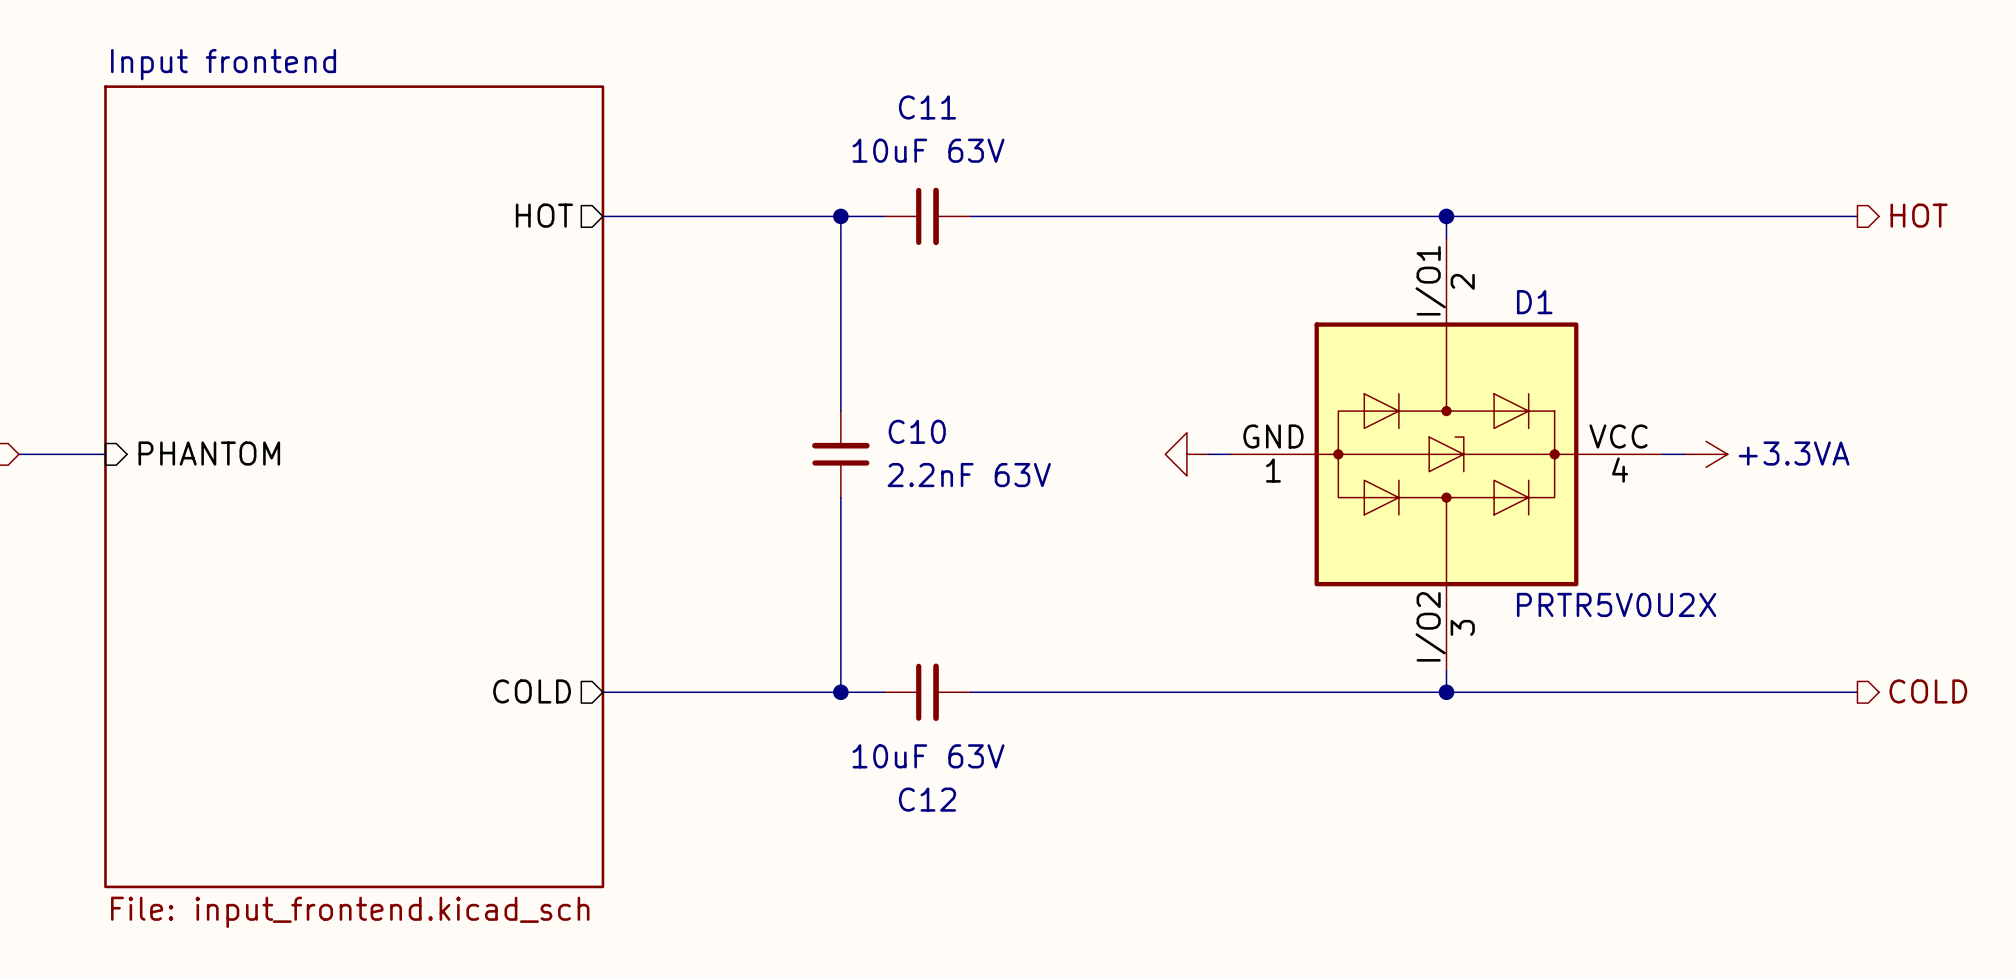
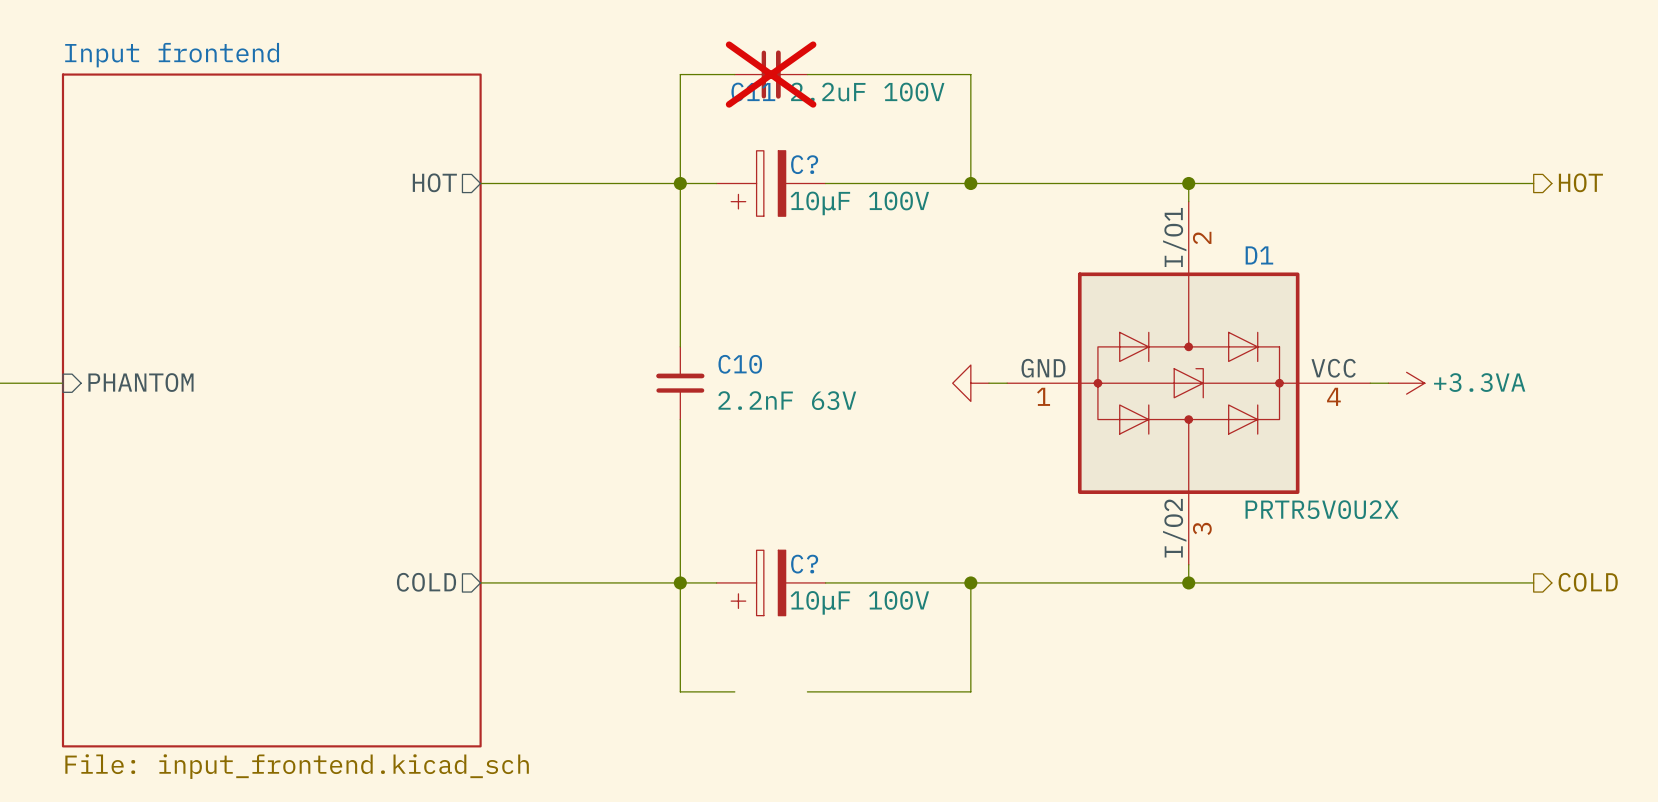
wire: none -> (734, 74) (680, 74) (680, 183)
C11 do-not-place cross: none -> (771, 74)
wire: none -> (807, 74) (970, 74) (970, 183)
C11 value: 10uF 63V (928, 150) -> 2.2uF 100V (867, 92)
C11 position: (927, 216) -> (771, 74)
C?: none -> 10μF 100V (771, 183)
junction: none -> (970, 183)
wire: none -> (680, 582) (680, 691) (734, 691)
C12: 10uF 63V (927, 692) -> none
C?: none -> 10μF 100V (771, 582)
wire: none -> (970, 582) (970, 691) (807, 691)
junction: none -> (970, 582)

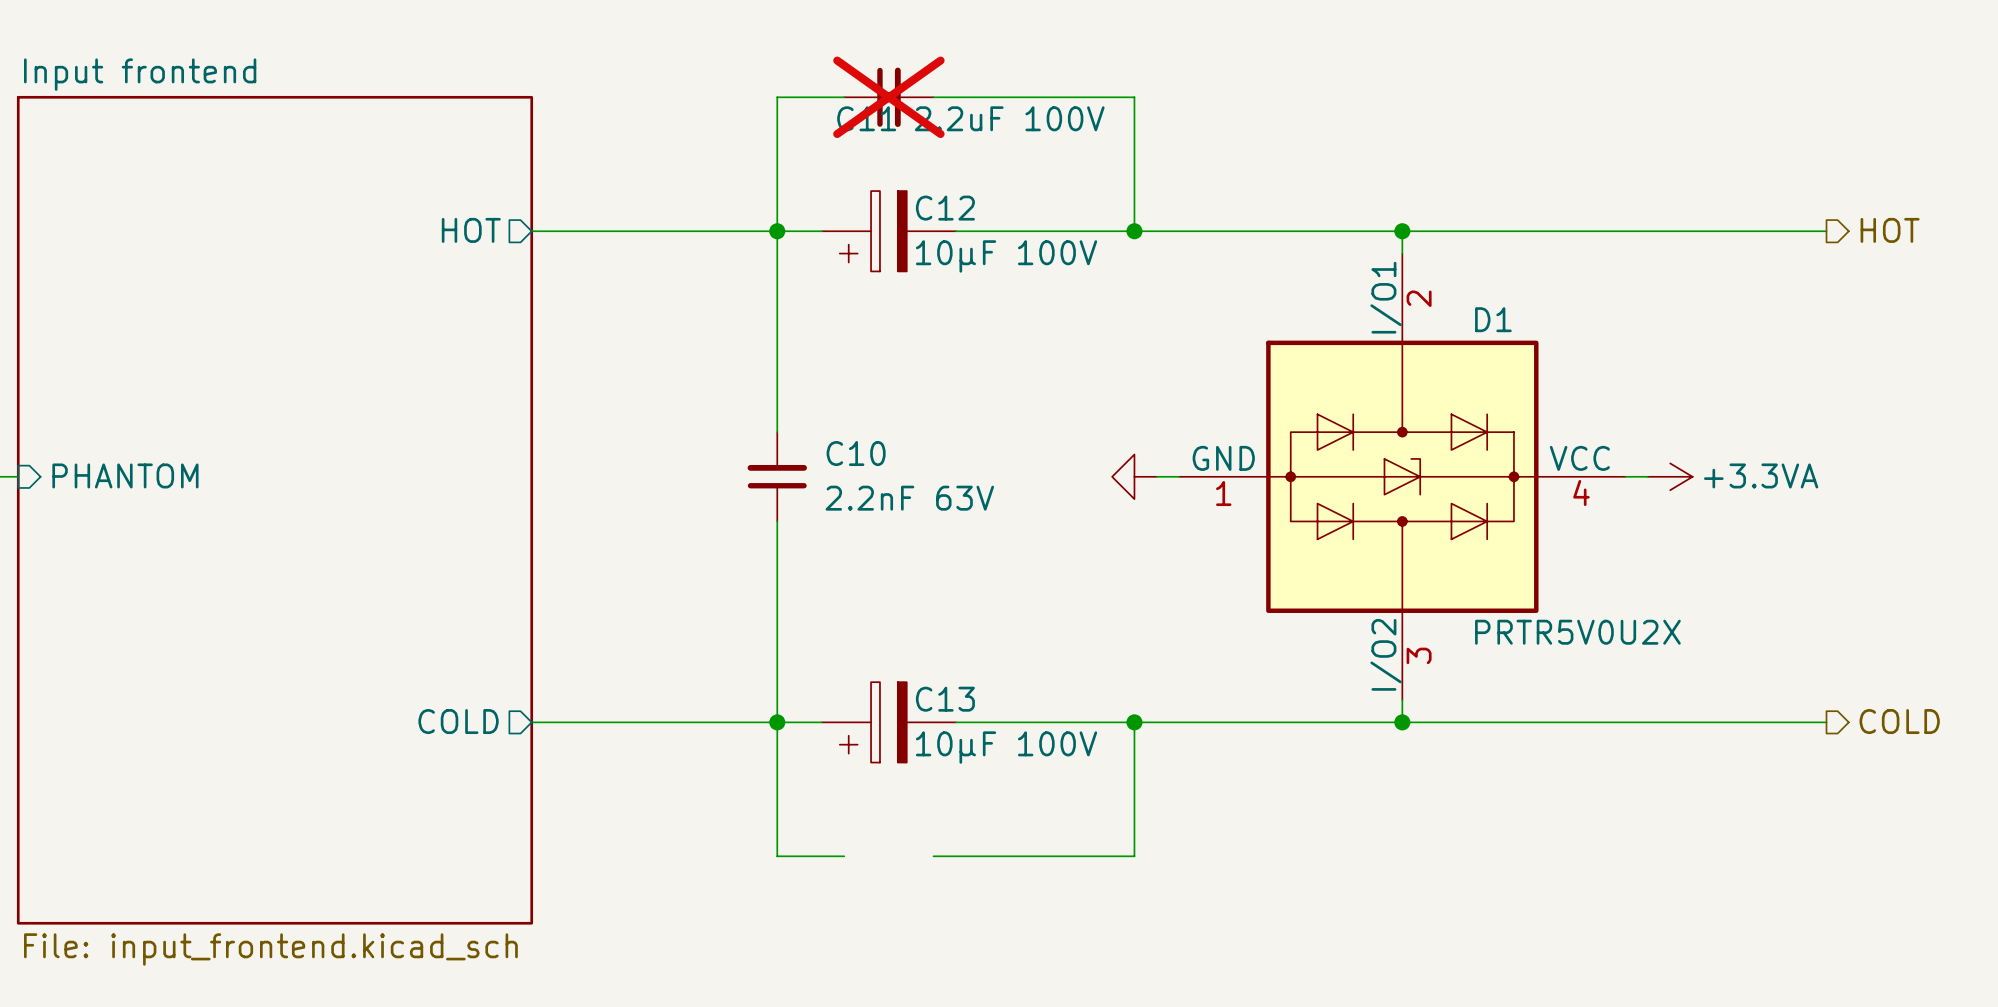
C? name: C? (804, 164) -> C12 (945, 208)
C? name: C? (804, 564) -> C13 (945, 699)

